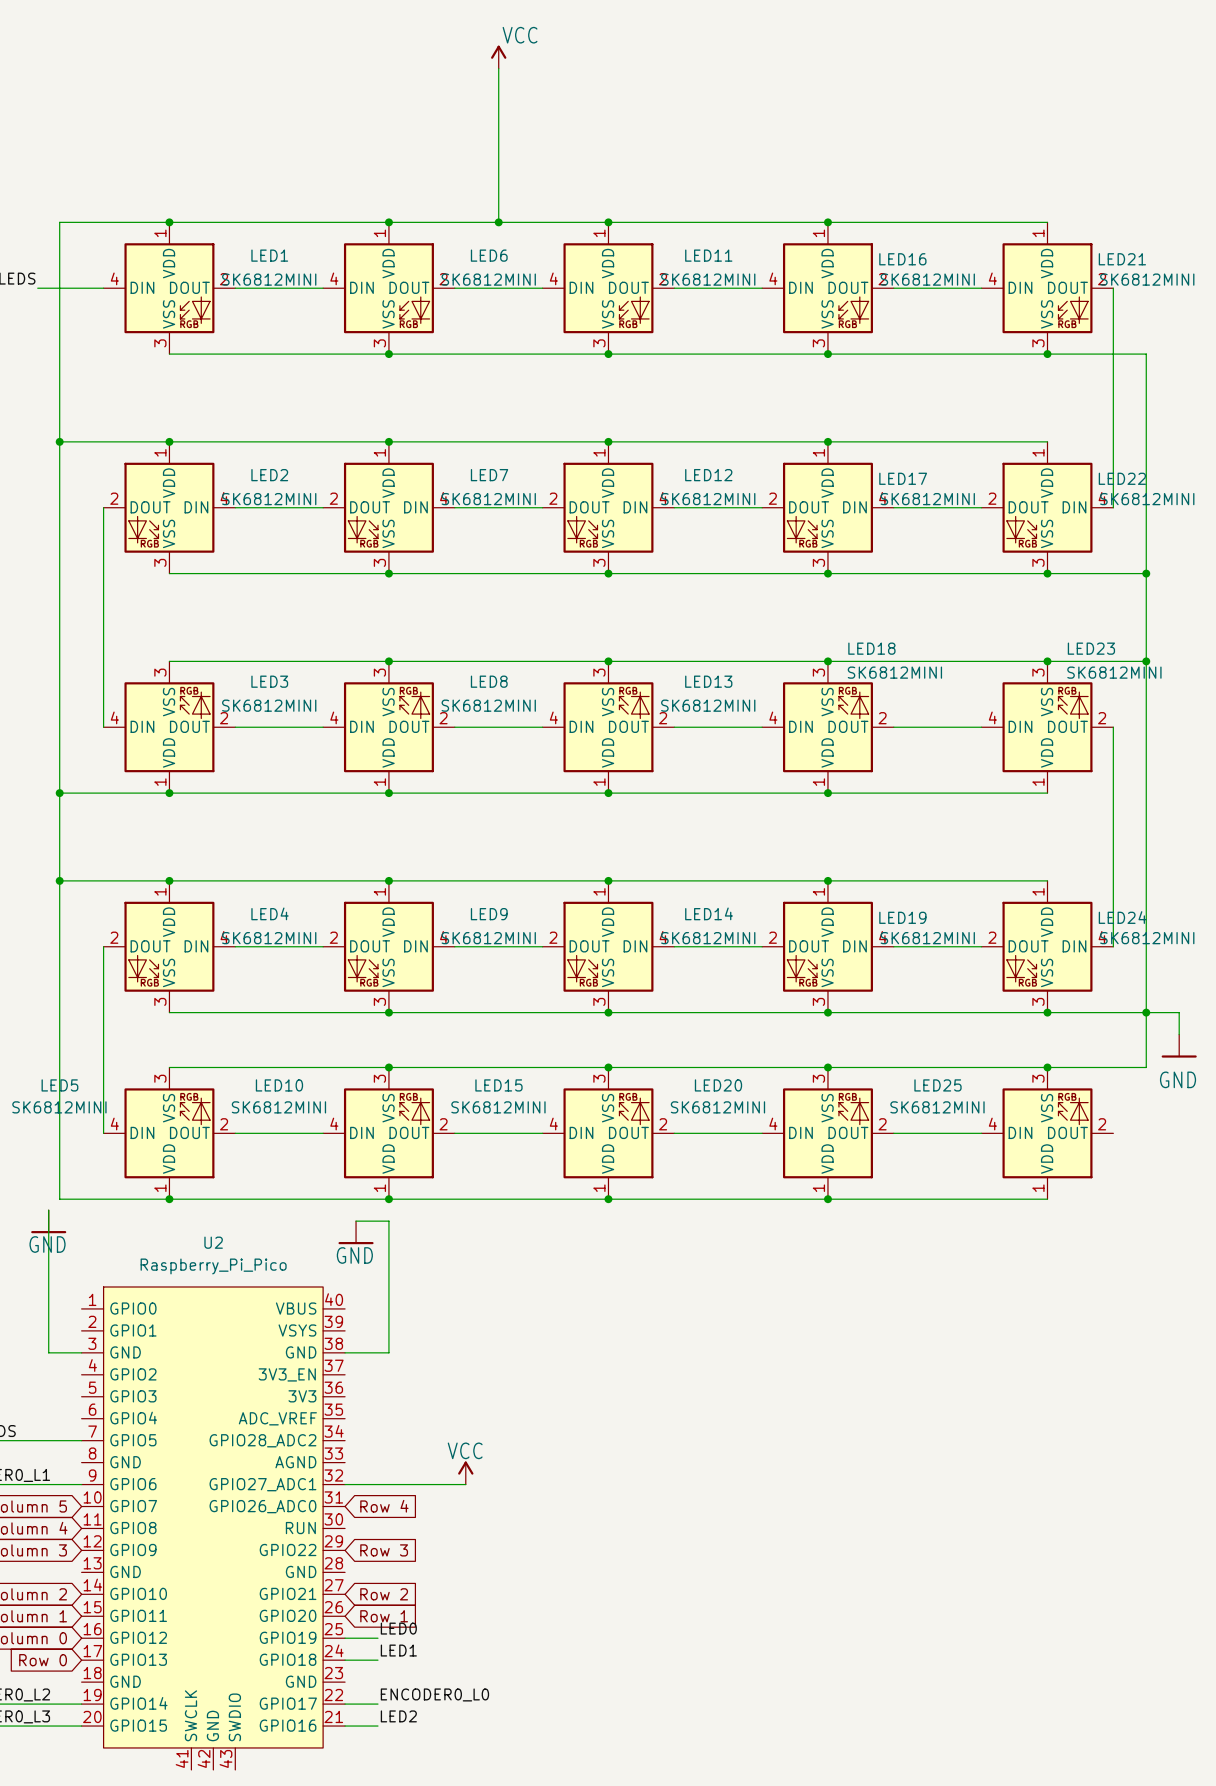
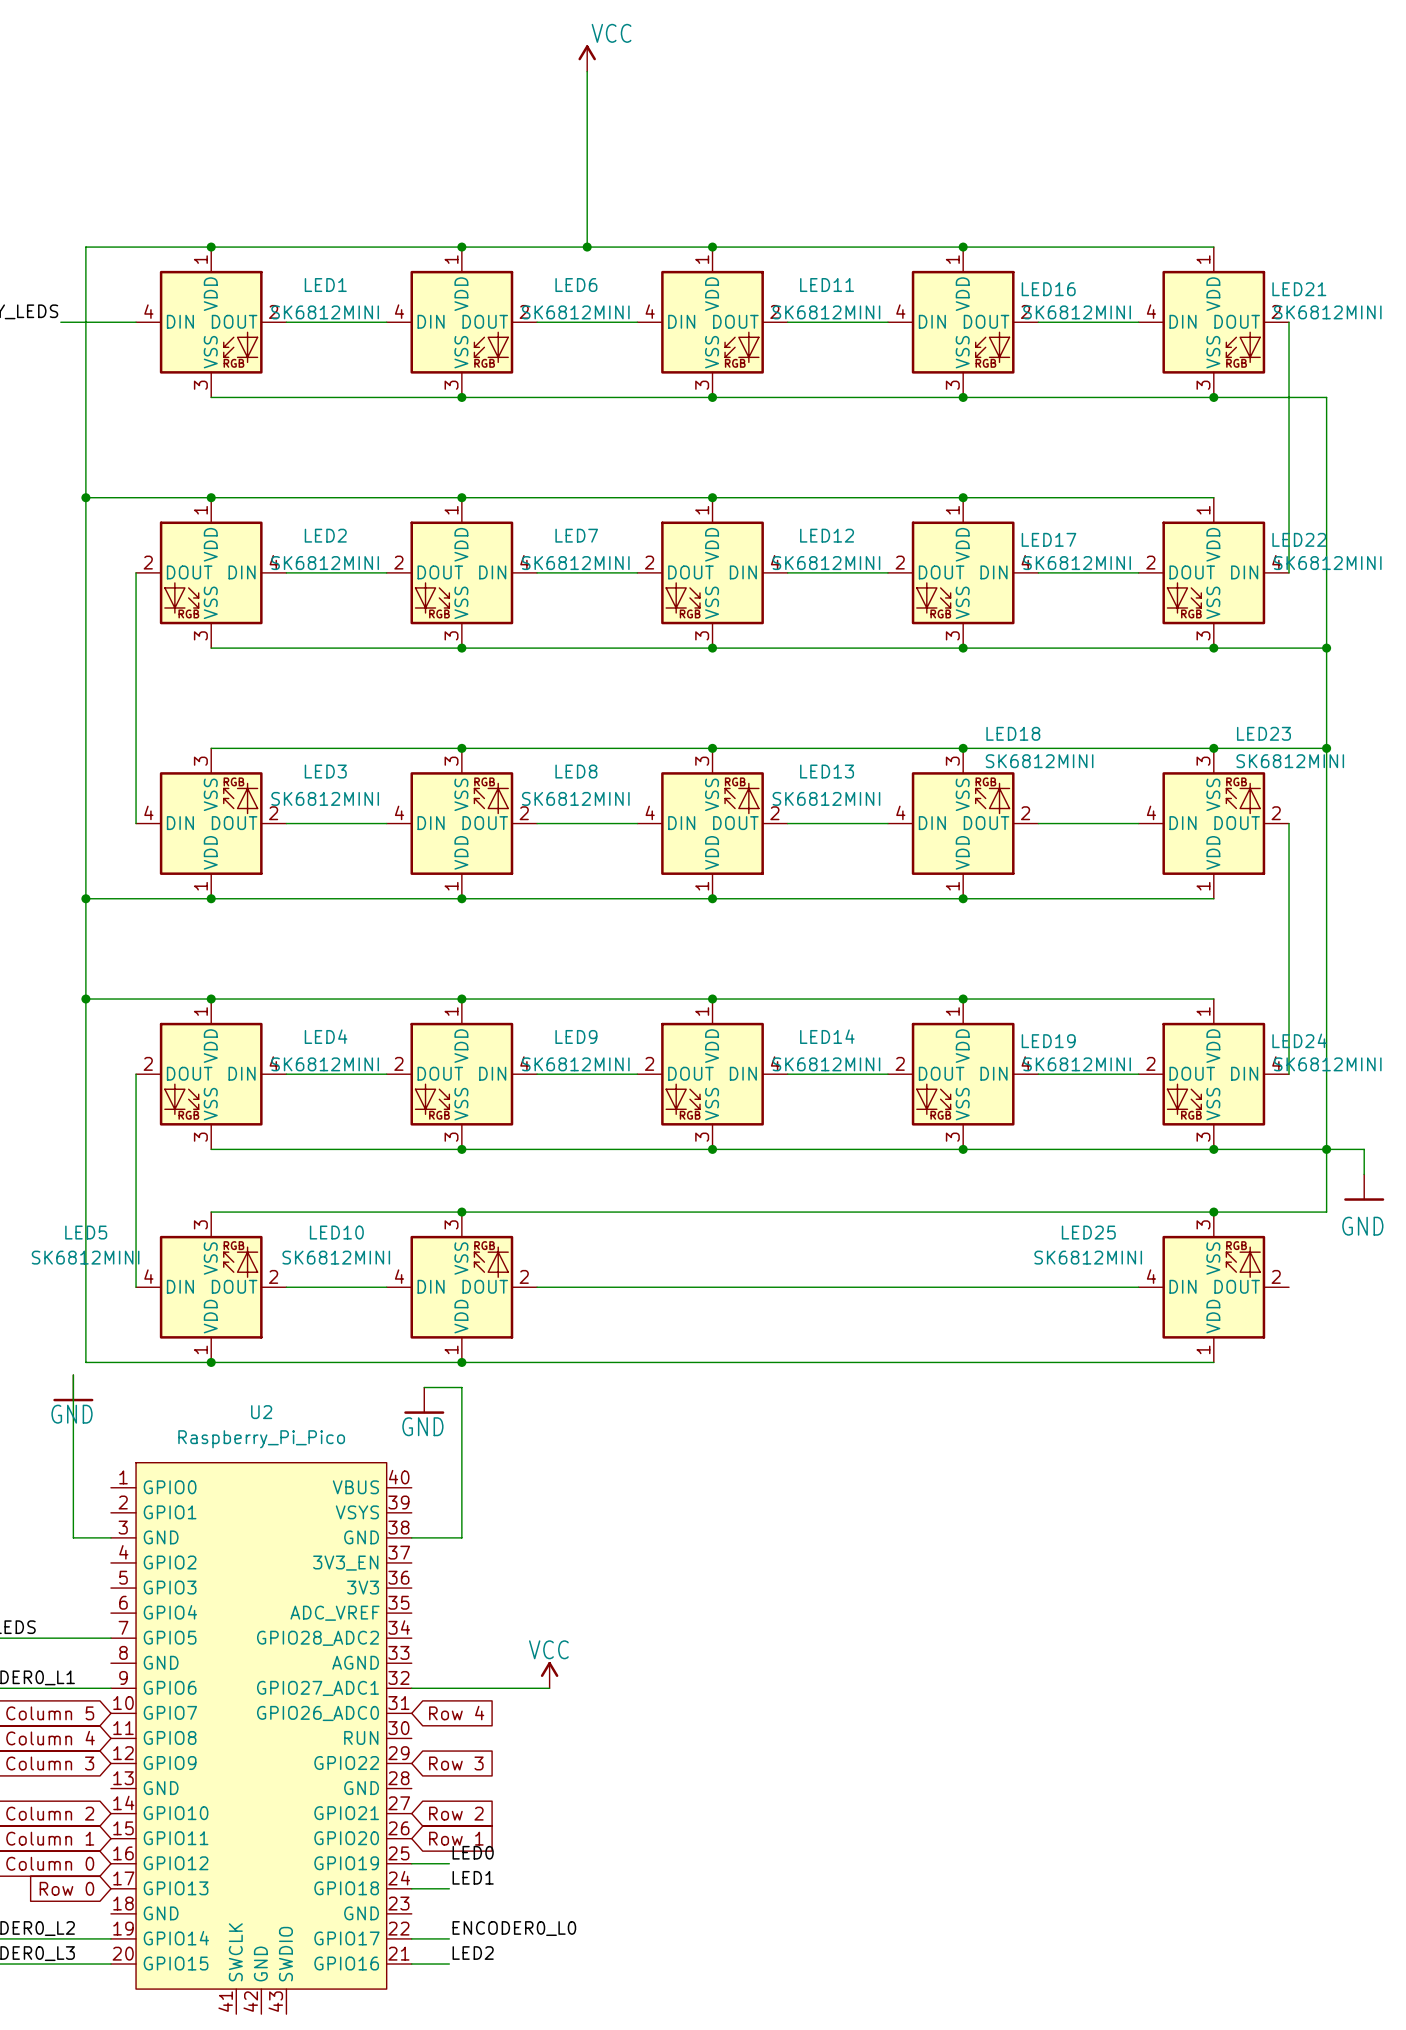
junction: (608, 1067) -> none
junction: (827, 1067) -> none
LED15: SK6812MINI (608, 1133) -> none
LED20: SK6812MINI (827, 1133) -> none
junction: (608, 1199) -> none
junction: (827, 1199) -> none

